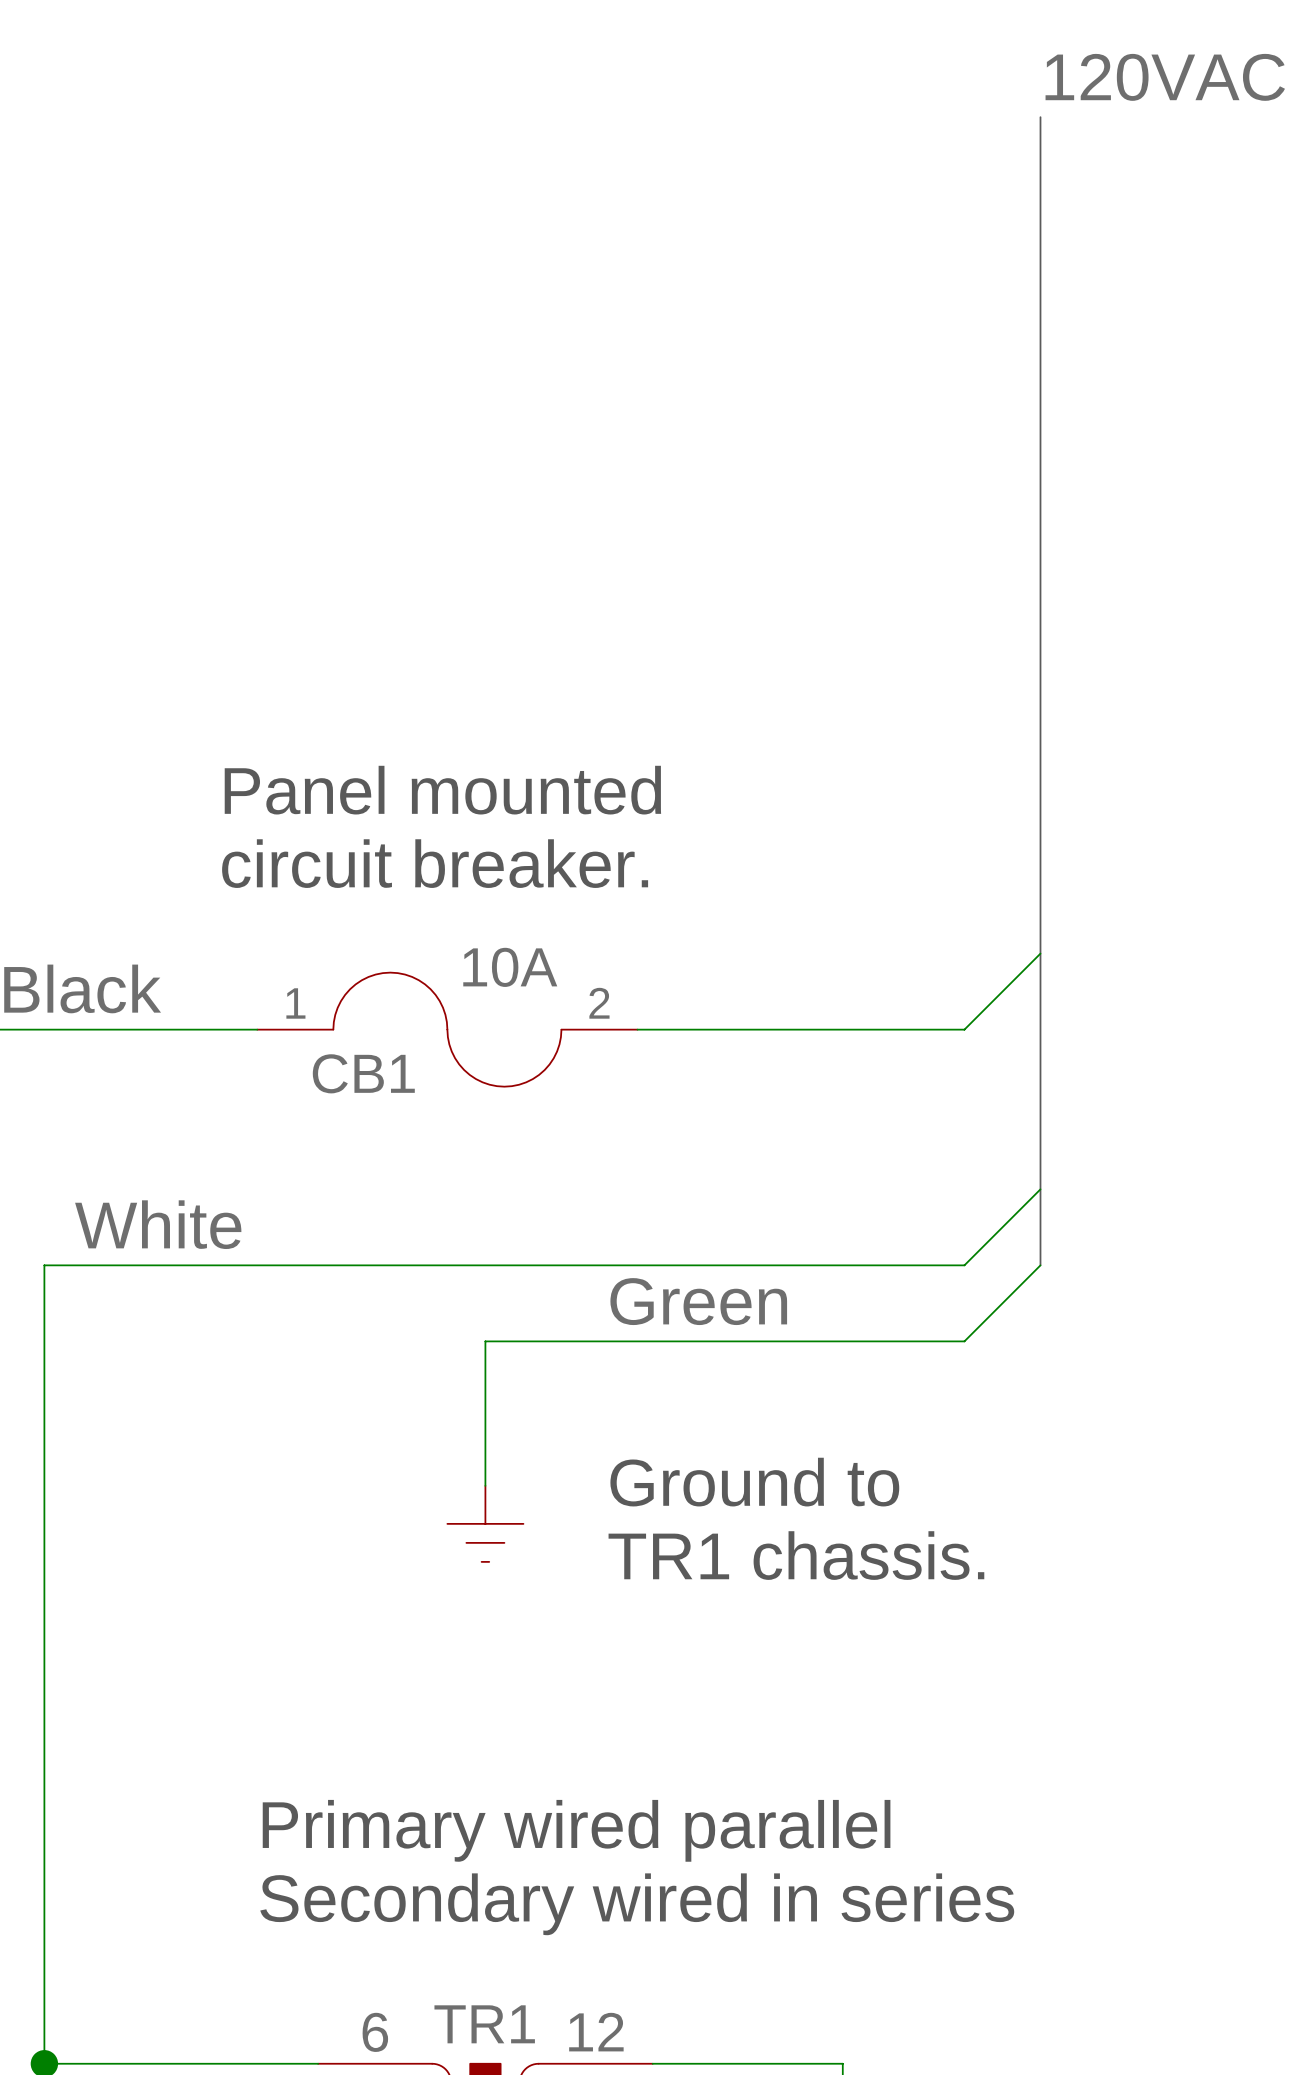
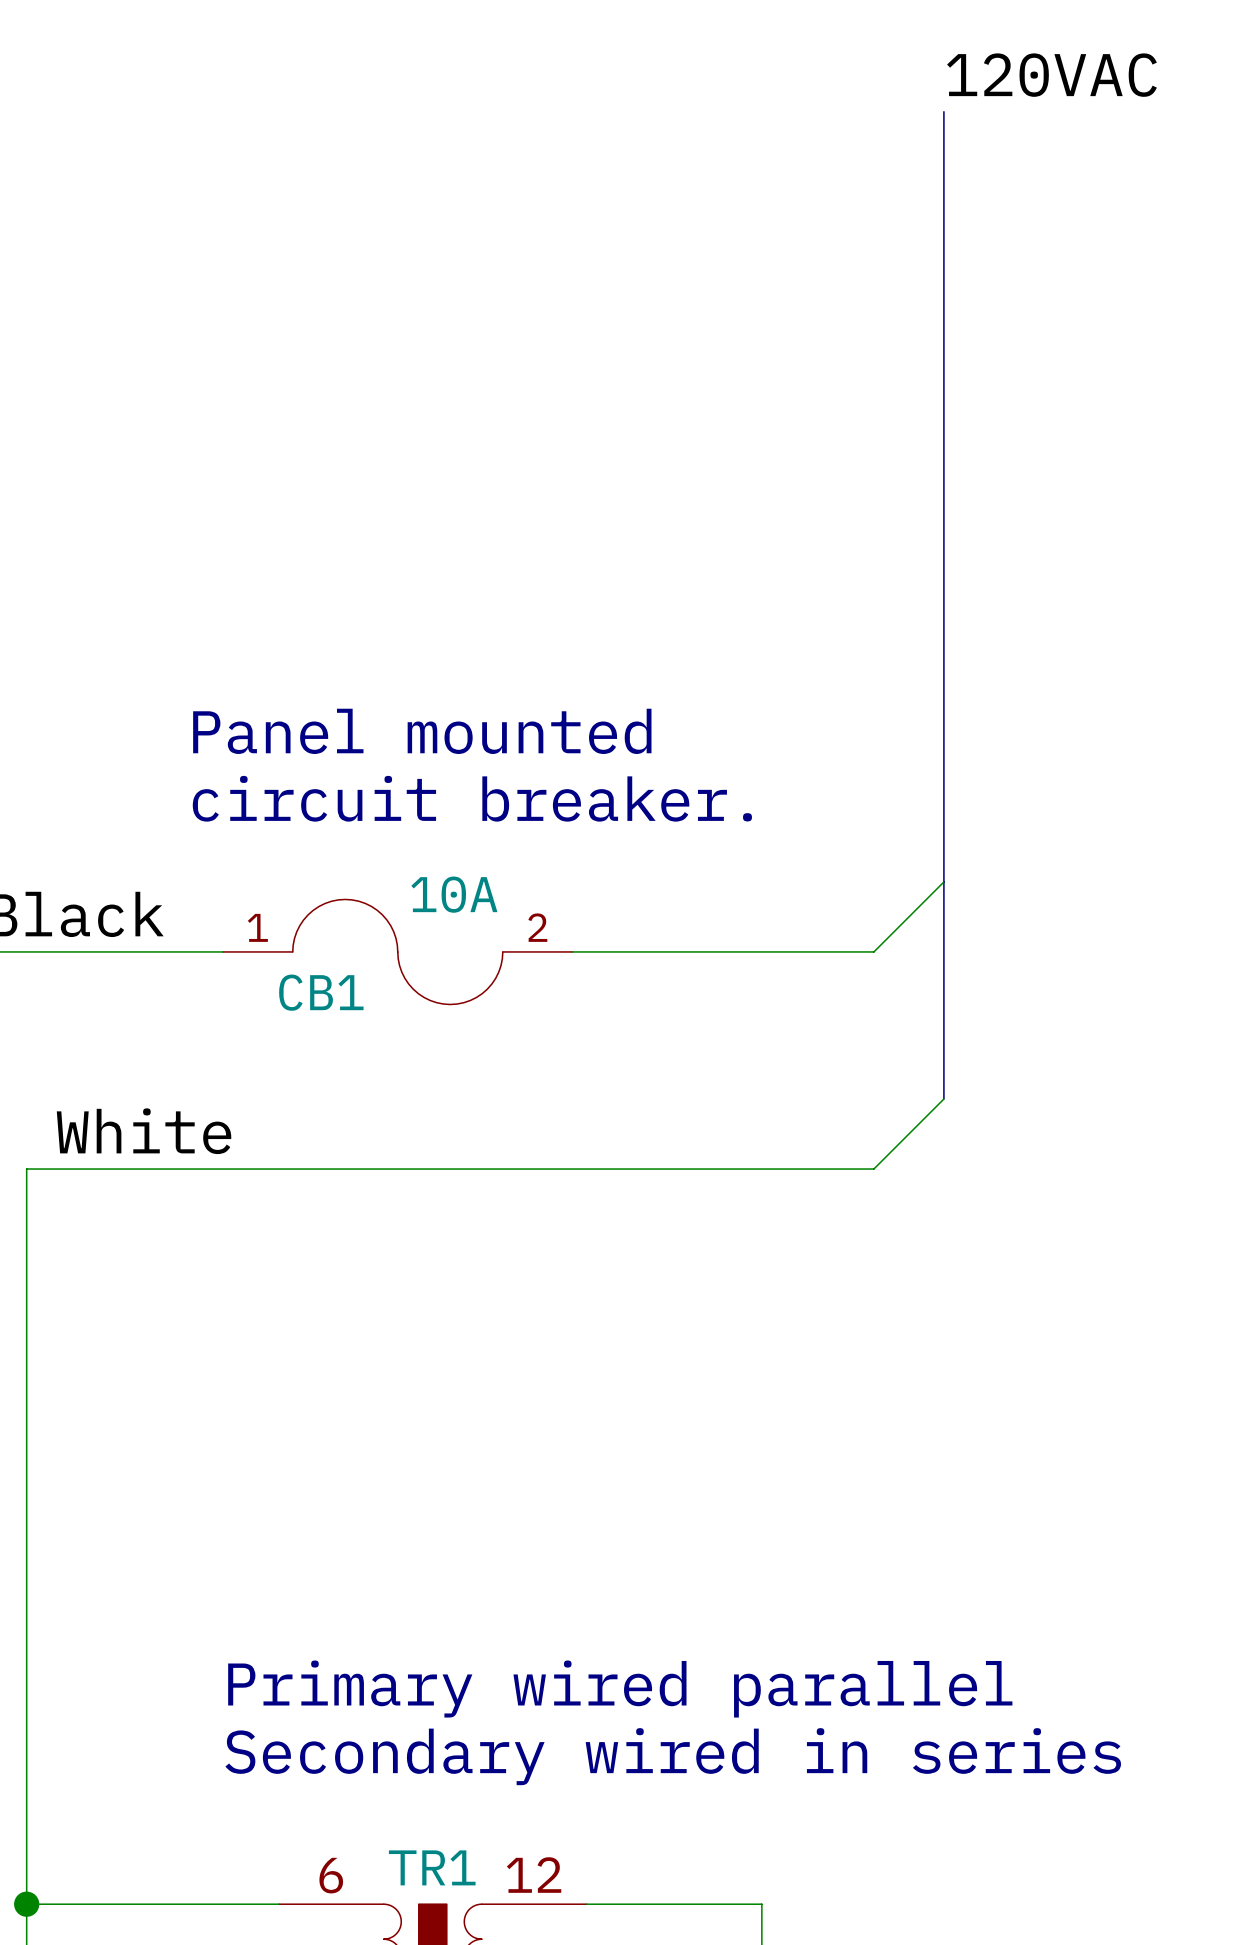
bus: (1040, 1189) (1040, 1265) -> none
wire: (1040, 1265) (964, 1341) (485, 1341) (485, 1485) -> none
label: Green (698, 1301) -> none
text: Ground to (754, 1482) -> none
power symbol: (485, 1523) -> none
text: TR1 chassis. (796, 1555) -> none

